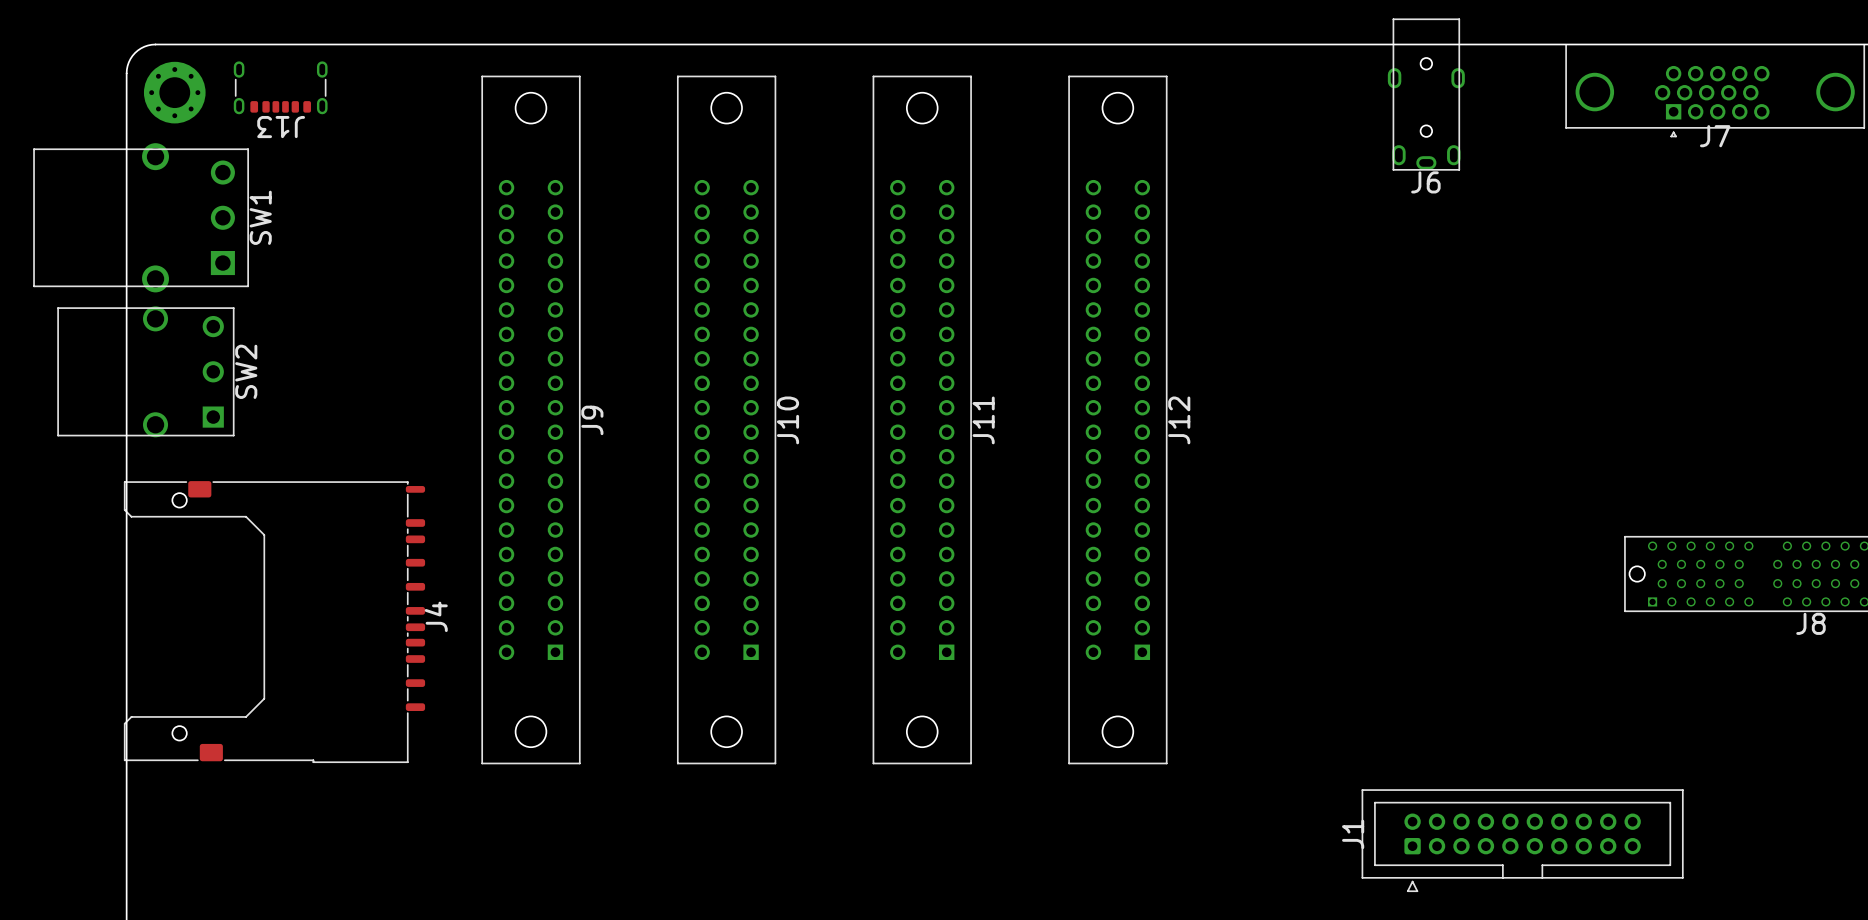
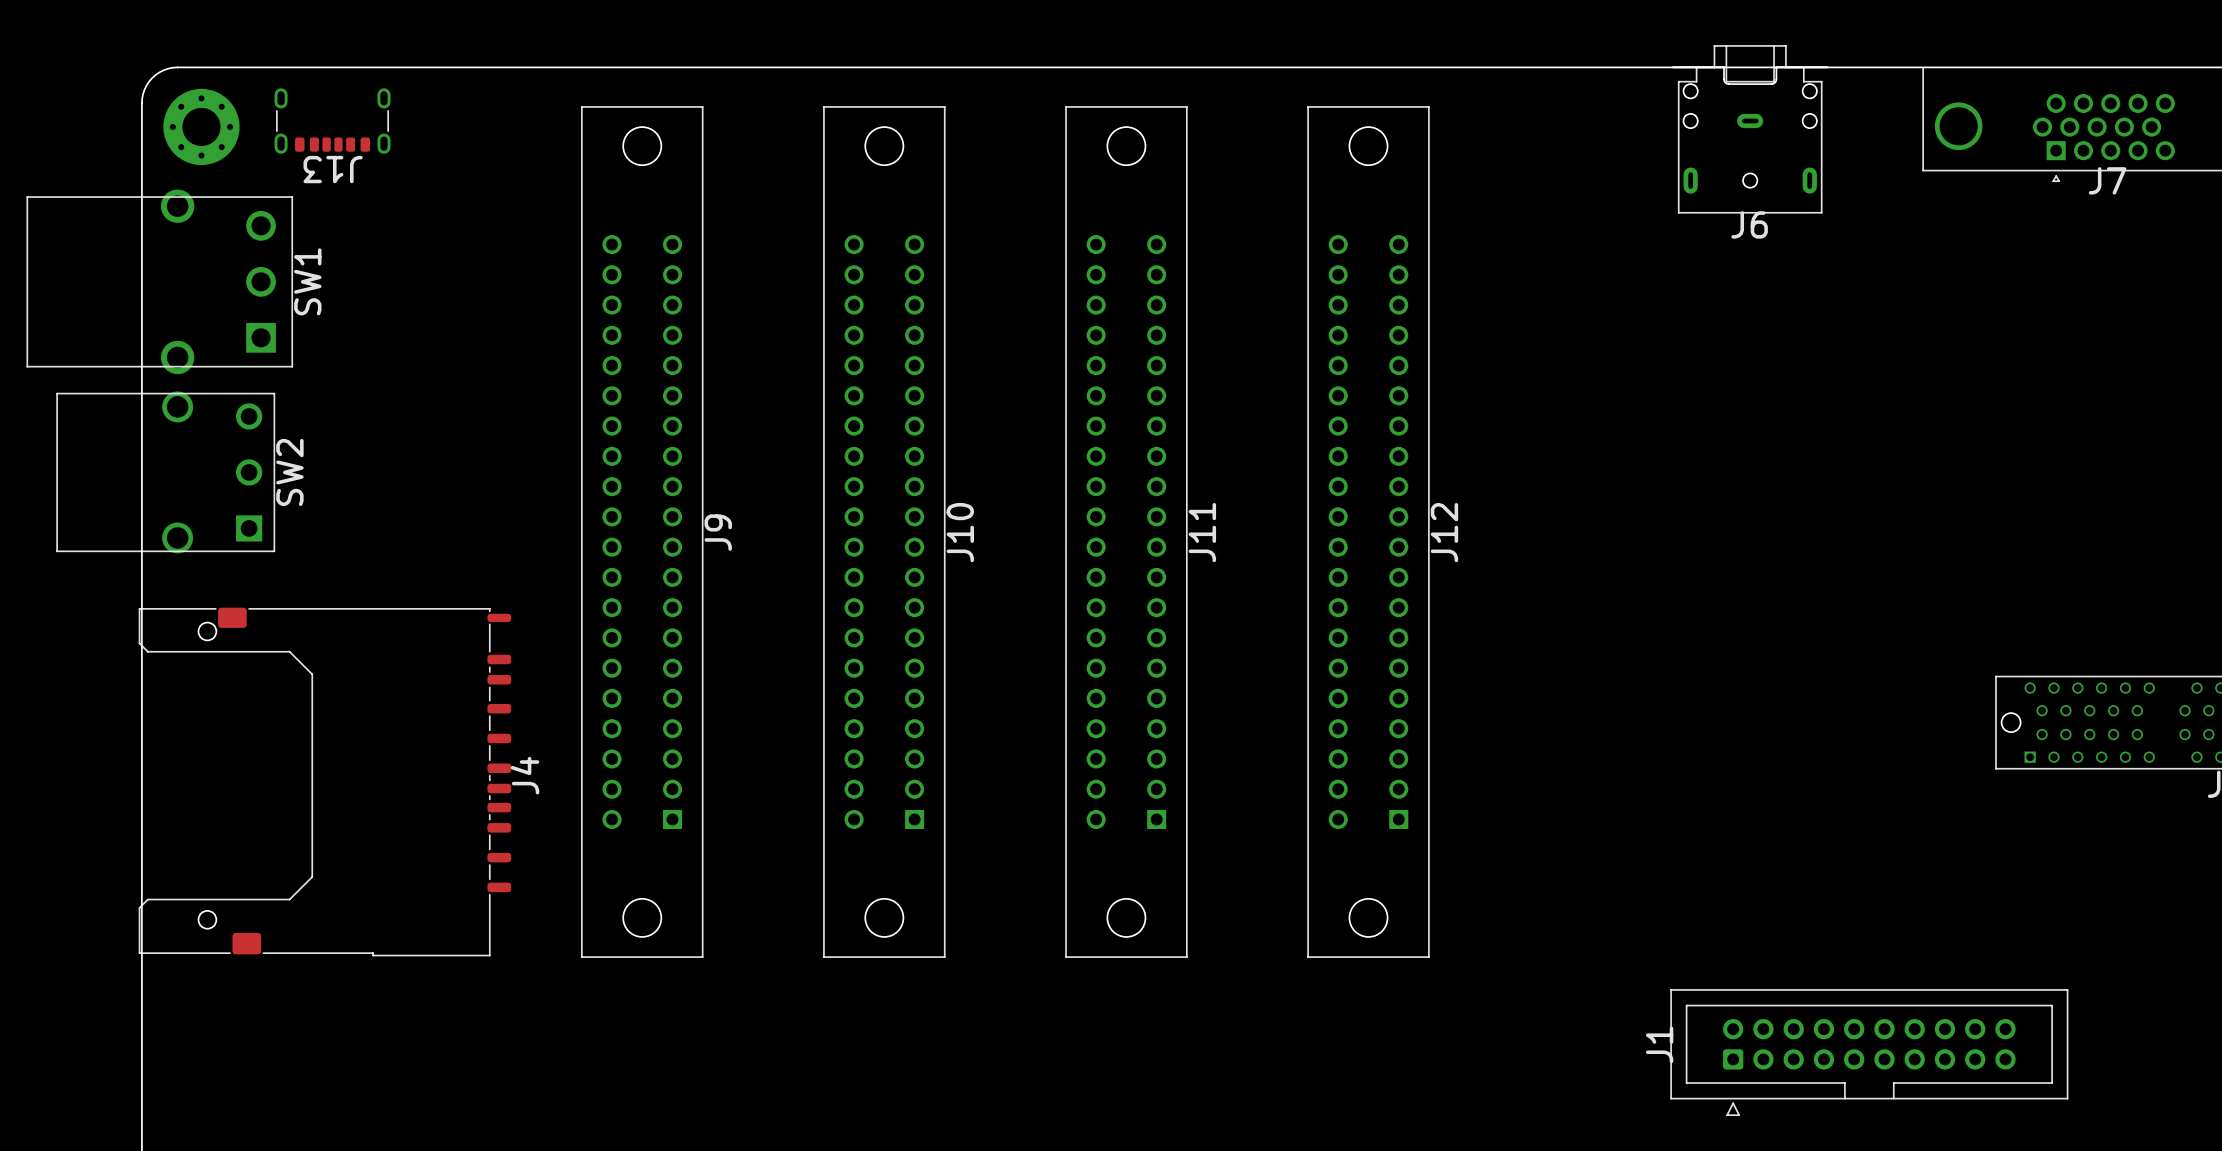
J6 footprint: [1387, 18, 1465, 171] -> [1672, 45, 1829, 214]

